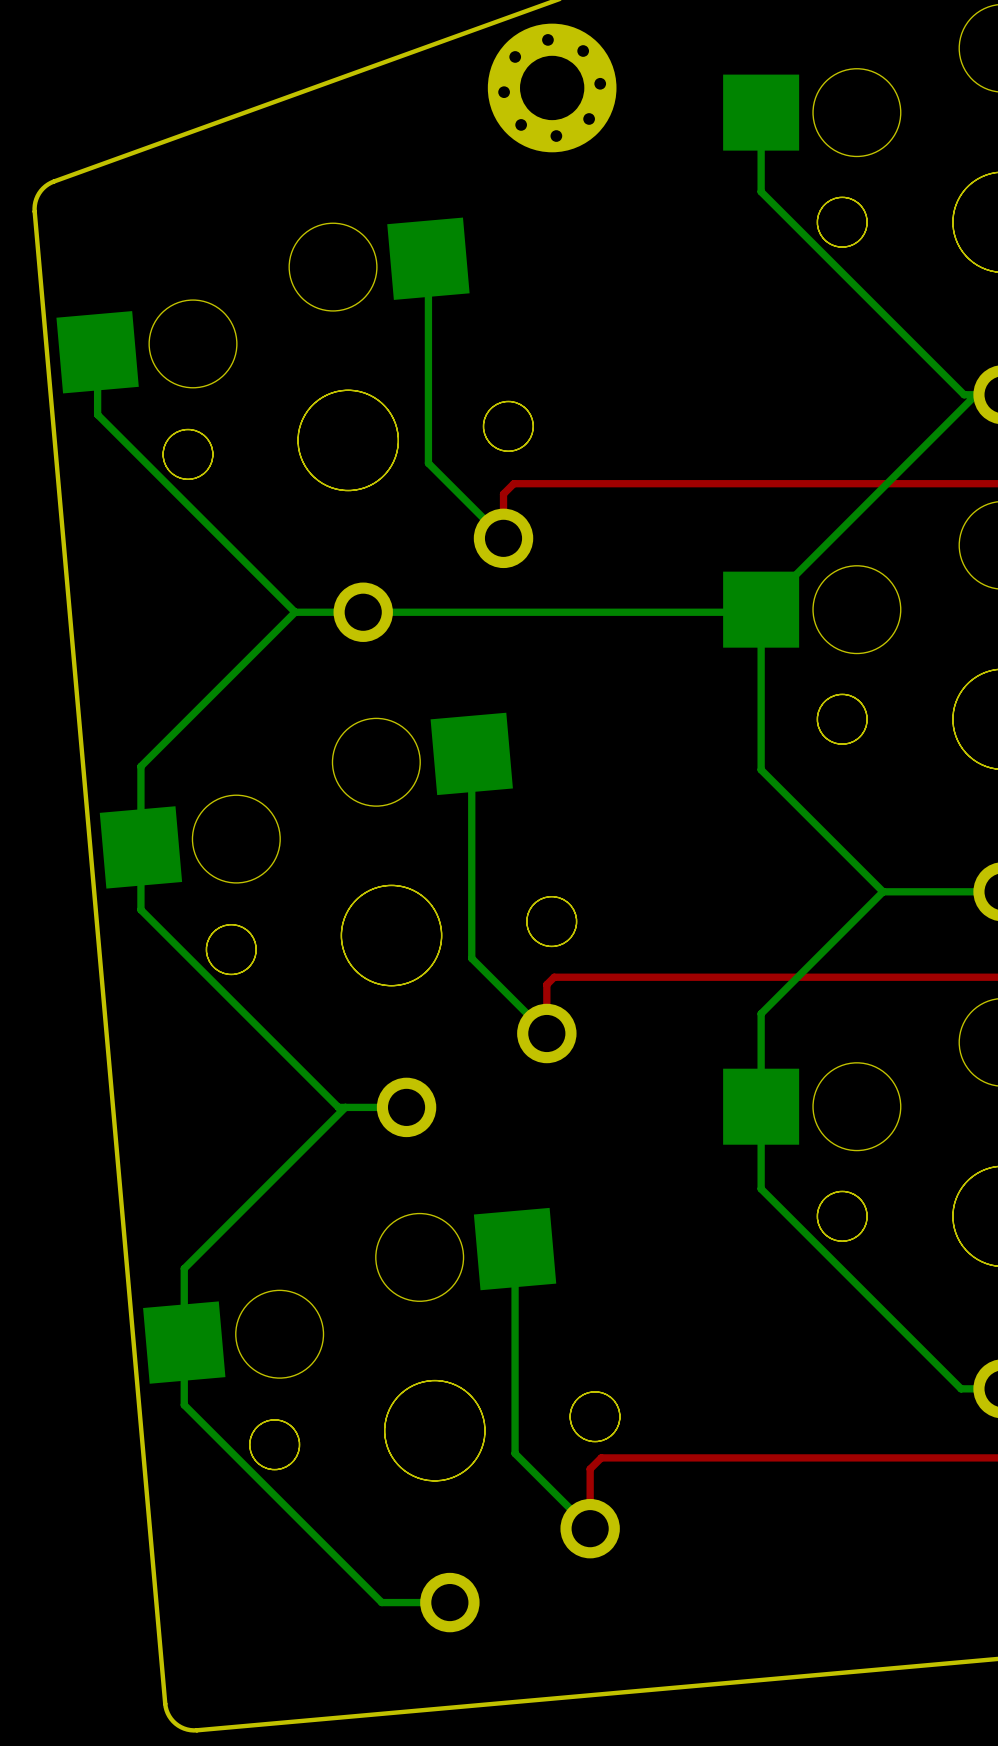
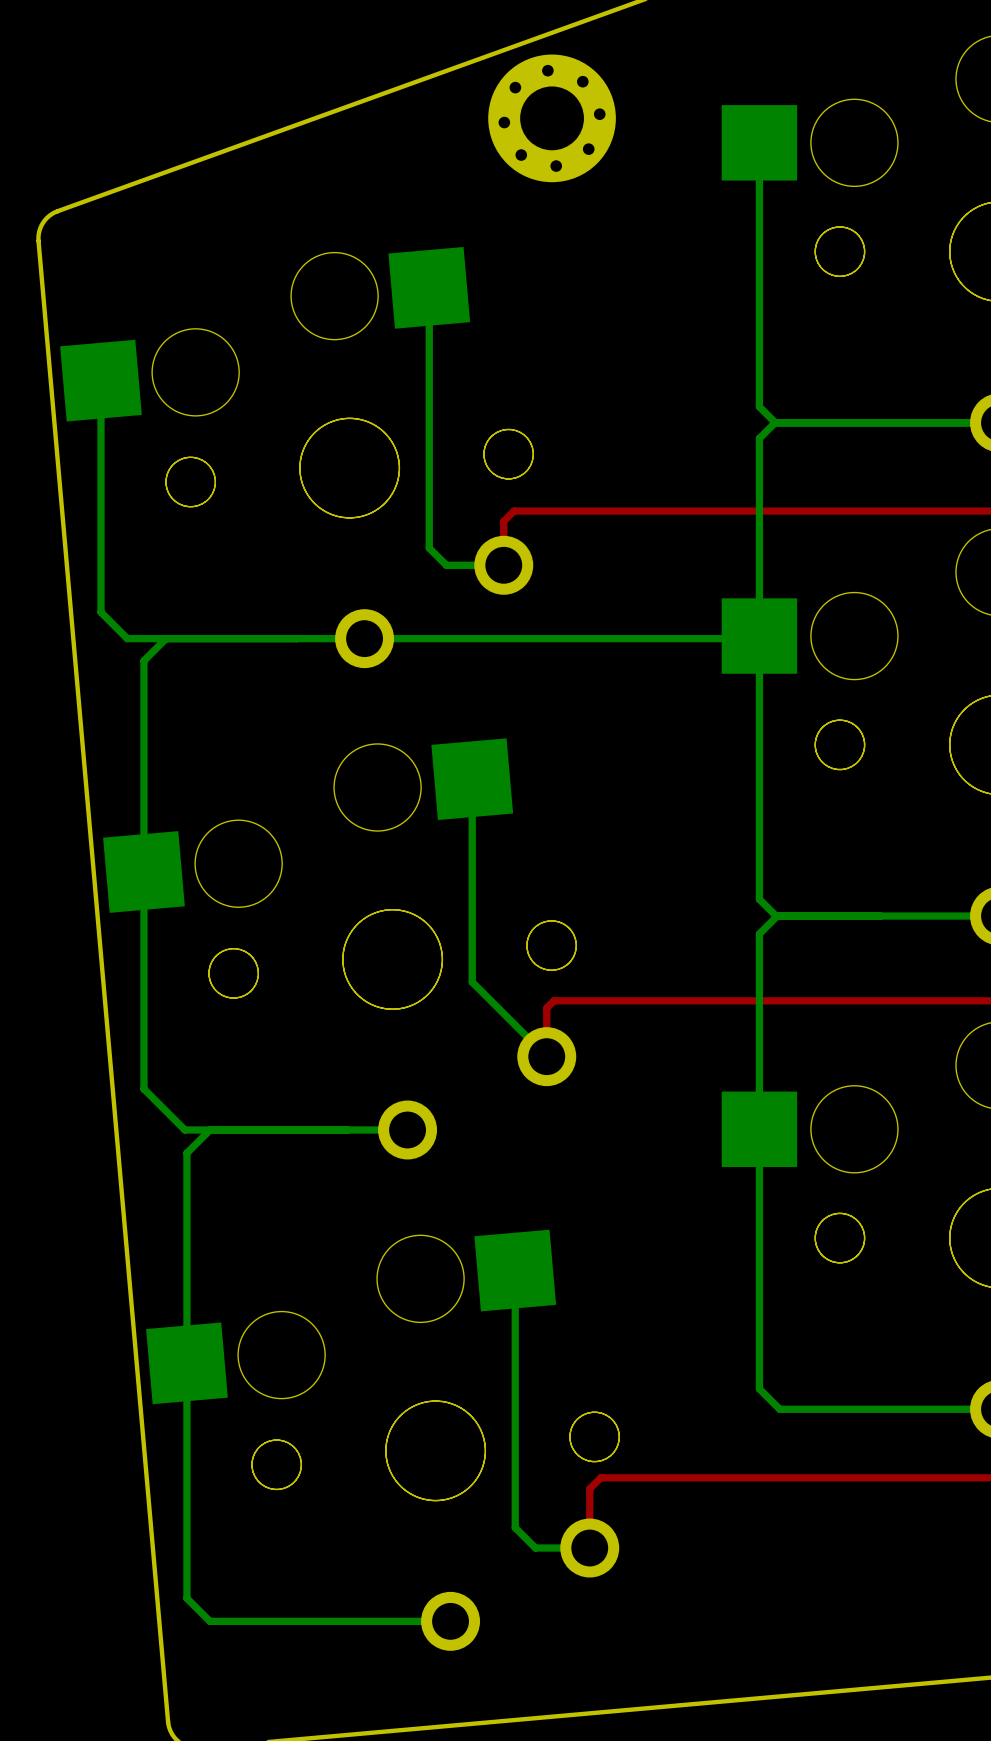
bottom track: (761, 191) (964, 394) -> (759, 221) (759, 406) (775, 422)
bottom track: (976, 394) (761, 609) -> (960, 422) (775, 422) (759, 438) (759, 636)
bottom track: (97, 414) (295, 612) (140, 766) -> (166, 638) (143, 660) (143, 791)
bottom track: none -> (100, 442) (100, 612) (127, 638) (297, 638)
bottom track: (428, 463) (503, 538) -> (429, 490) (429, 548) (446, 565) (503, 565)
bottom track: (761, 769) (883, 891) (761, 1013) -> (777, 916) (759, 933) (759, 1037)
bottom track: none -> (759, 795) (759, 899) (776, 916) (880, 916)
bottom track: (140, 909) (338, 1107) -> (143, 933) (143, 1089) (184, 1130) (339, 1130)
bottom track: (345, 1107) (184, 1268) -> (210, 1130) (186, 1153) (186, 1289)
bottom track: (761, 1188) (961, 1388) -> (759, 1210) (759, 1388) (779, 1409) (957, 1409)
bottom track: (184, 1405) (381, 1602) -> (186, 1425) (186, 1598) (209, 1621) (382, 1621)
bottom track: (515, 1453) (590, 1528) -> (515, 1473) (515, 1527) (535, 1548) (589, 1548)

